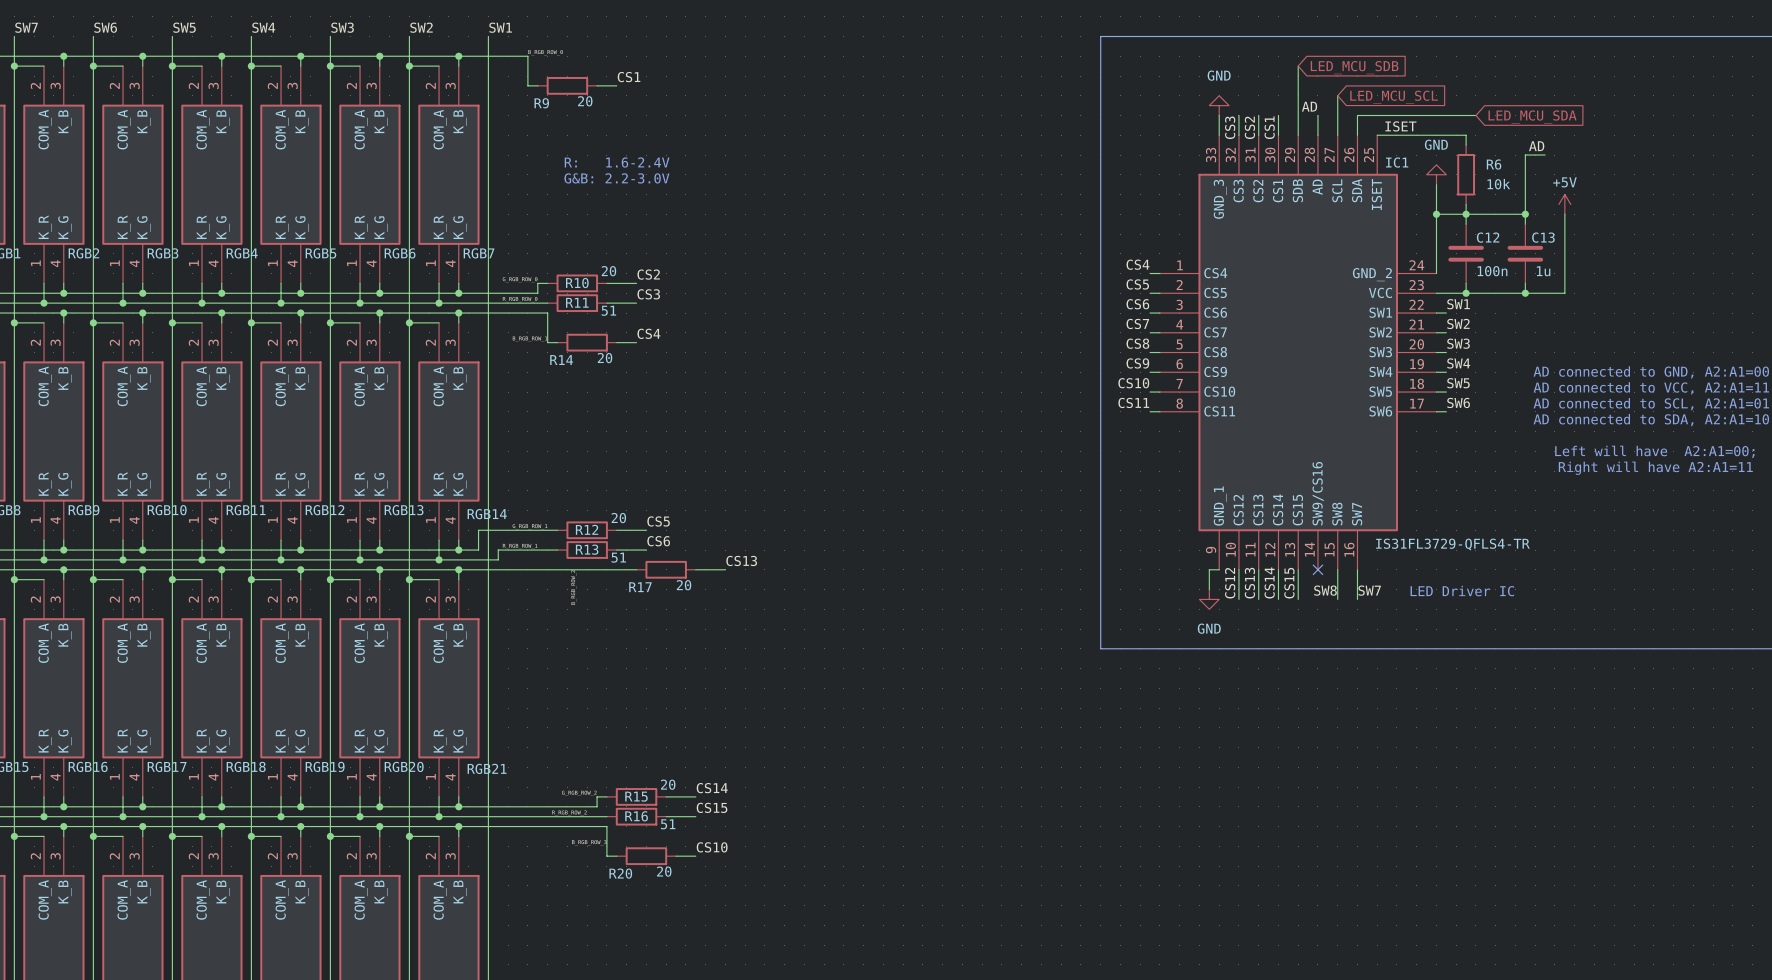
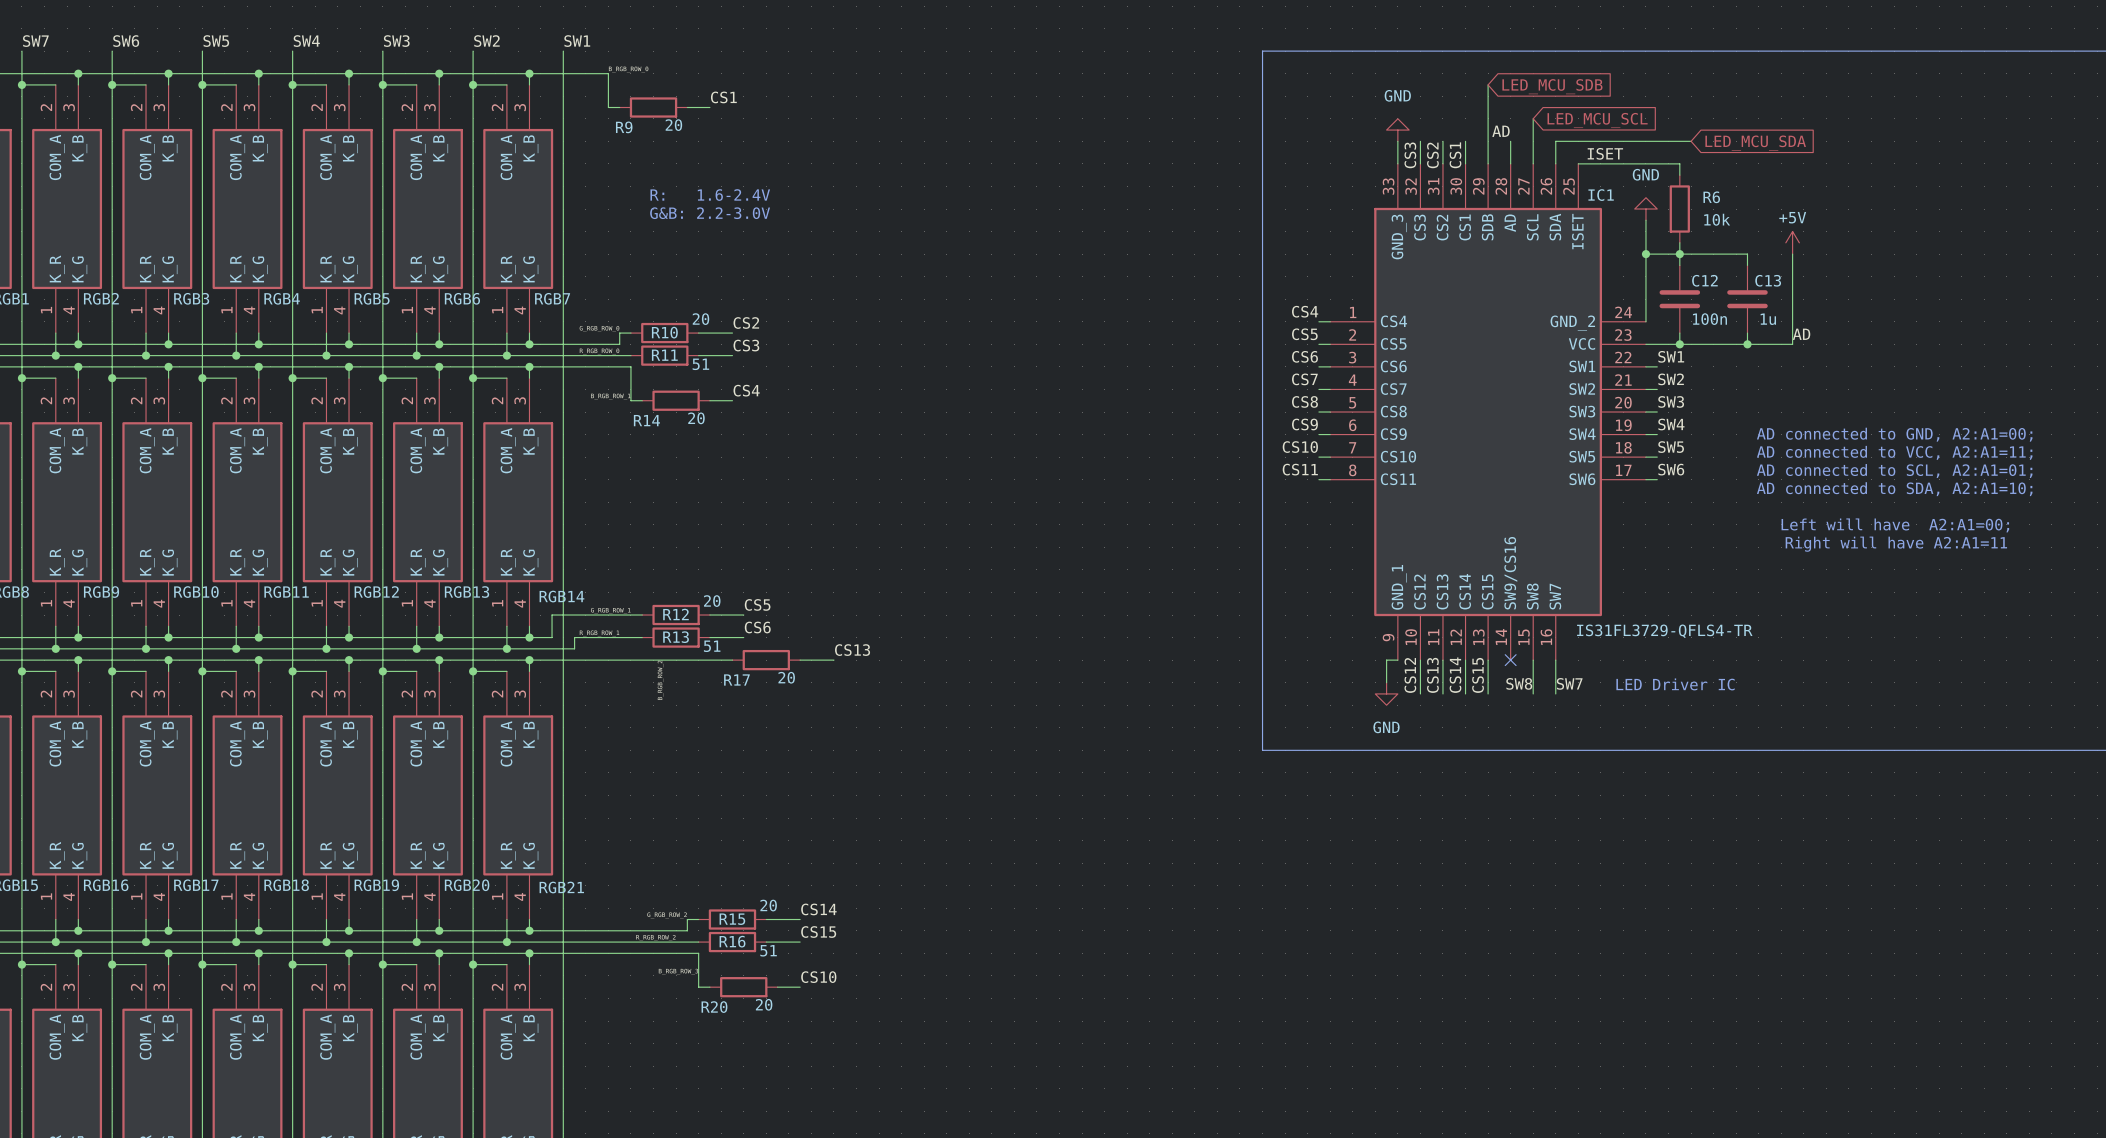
label position: AD (1536, 146) -> AD (1801, 334)
wire: (1545, 155) (1525, 155) (1525, 214) -> none
junction: (1525, 214) -> none

